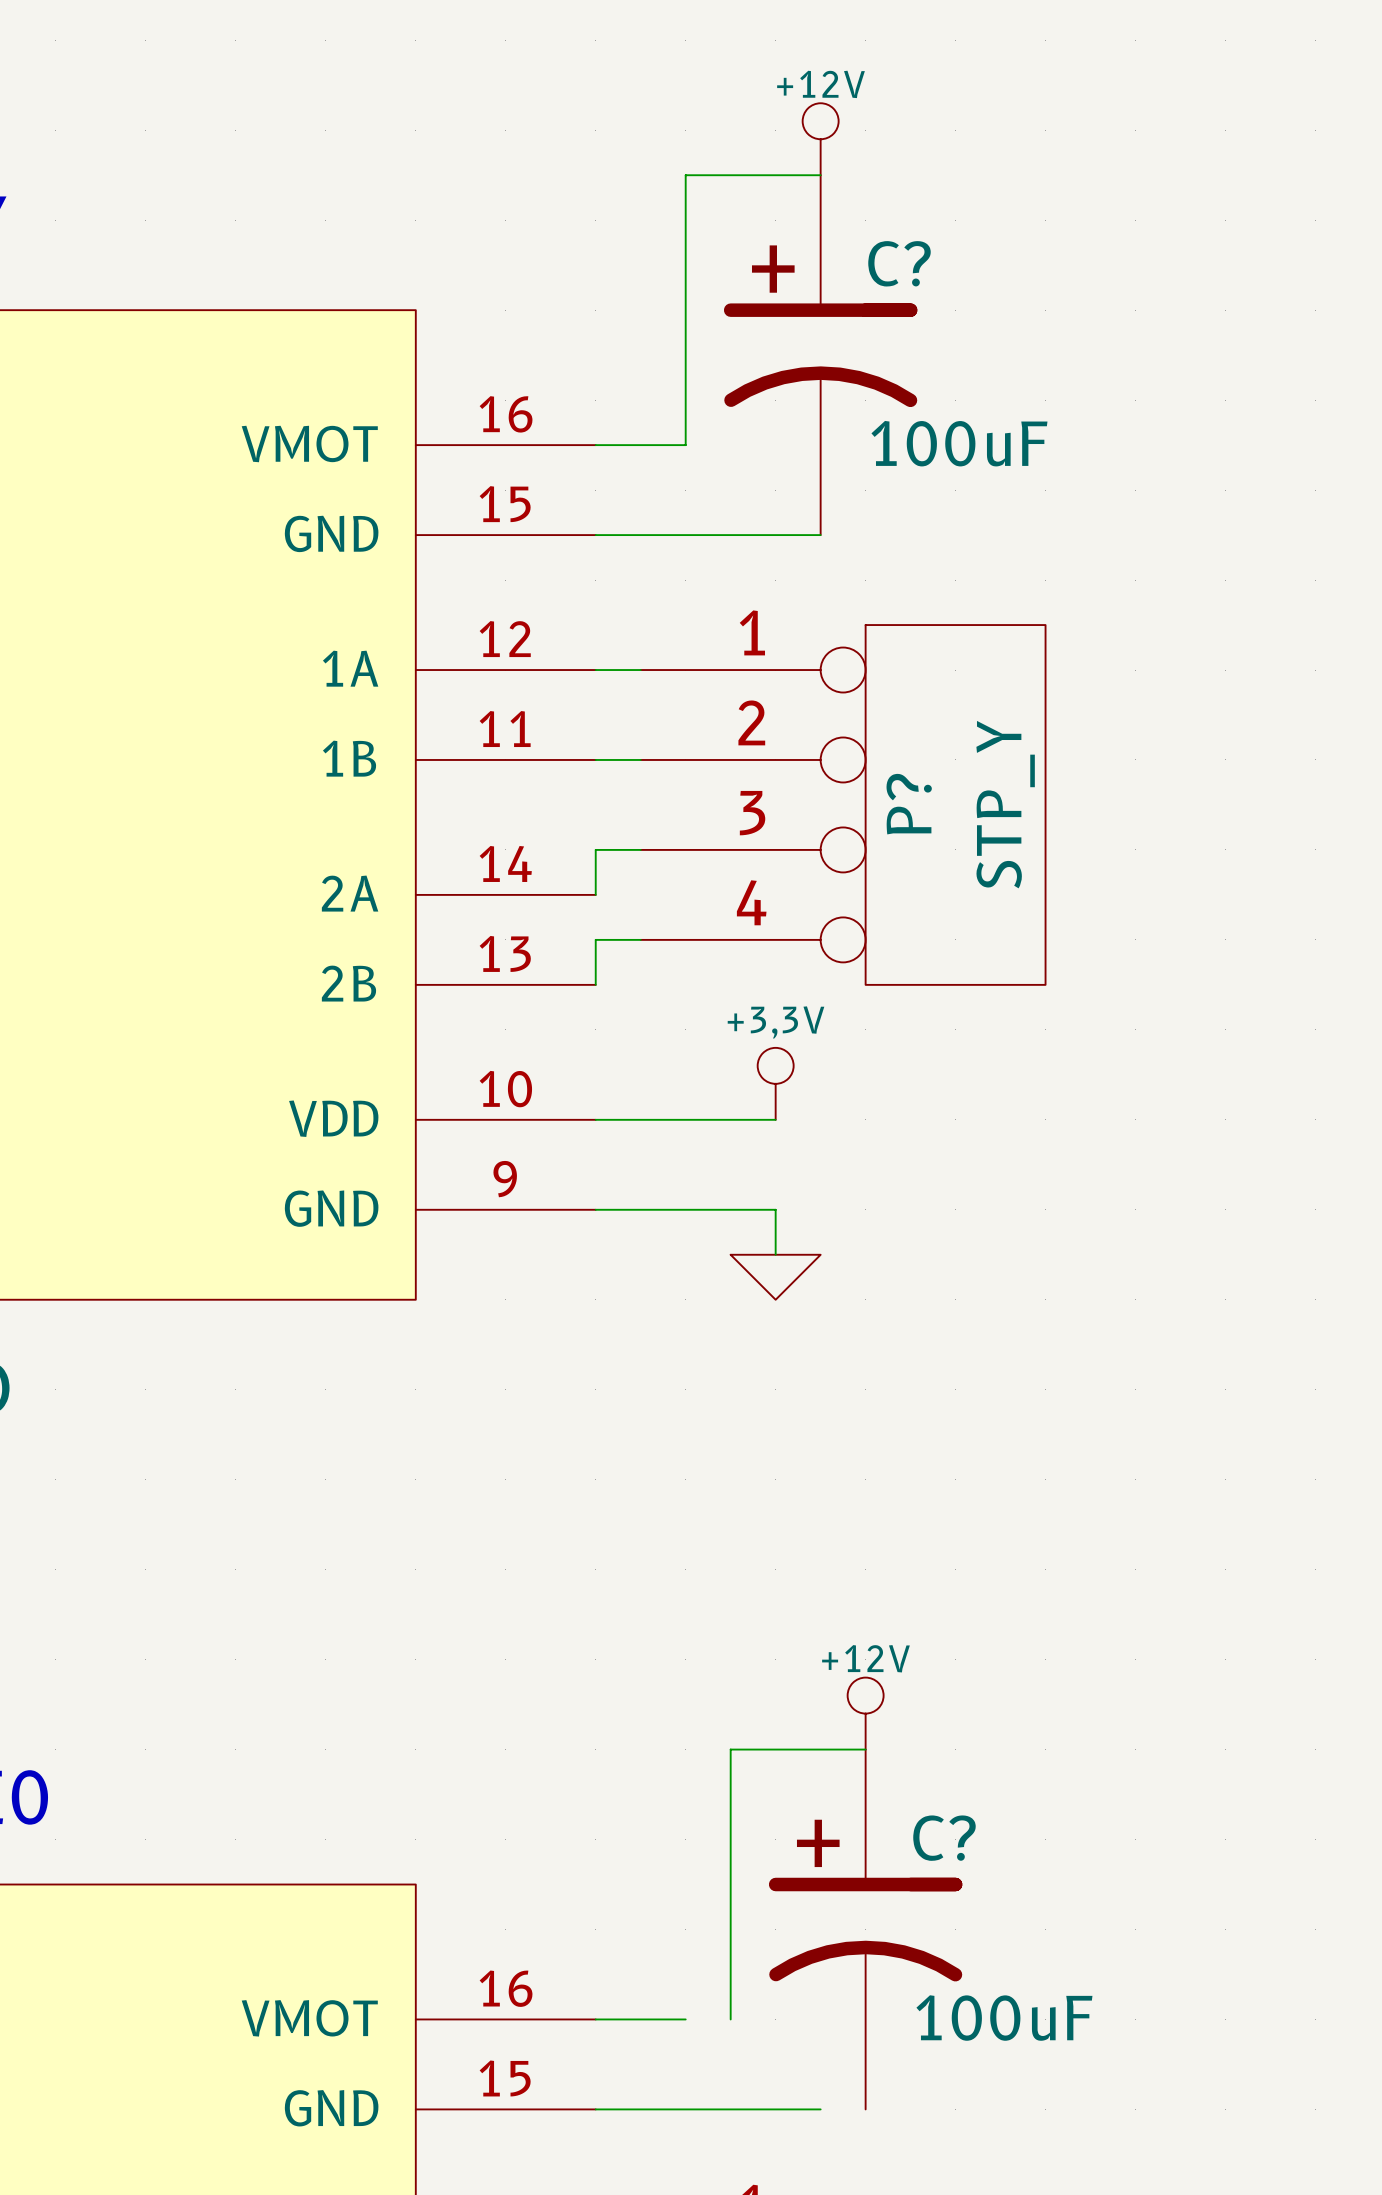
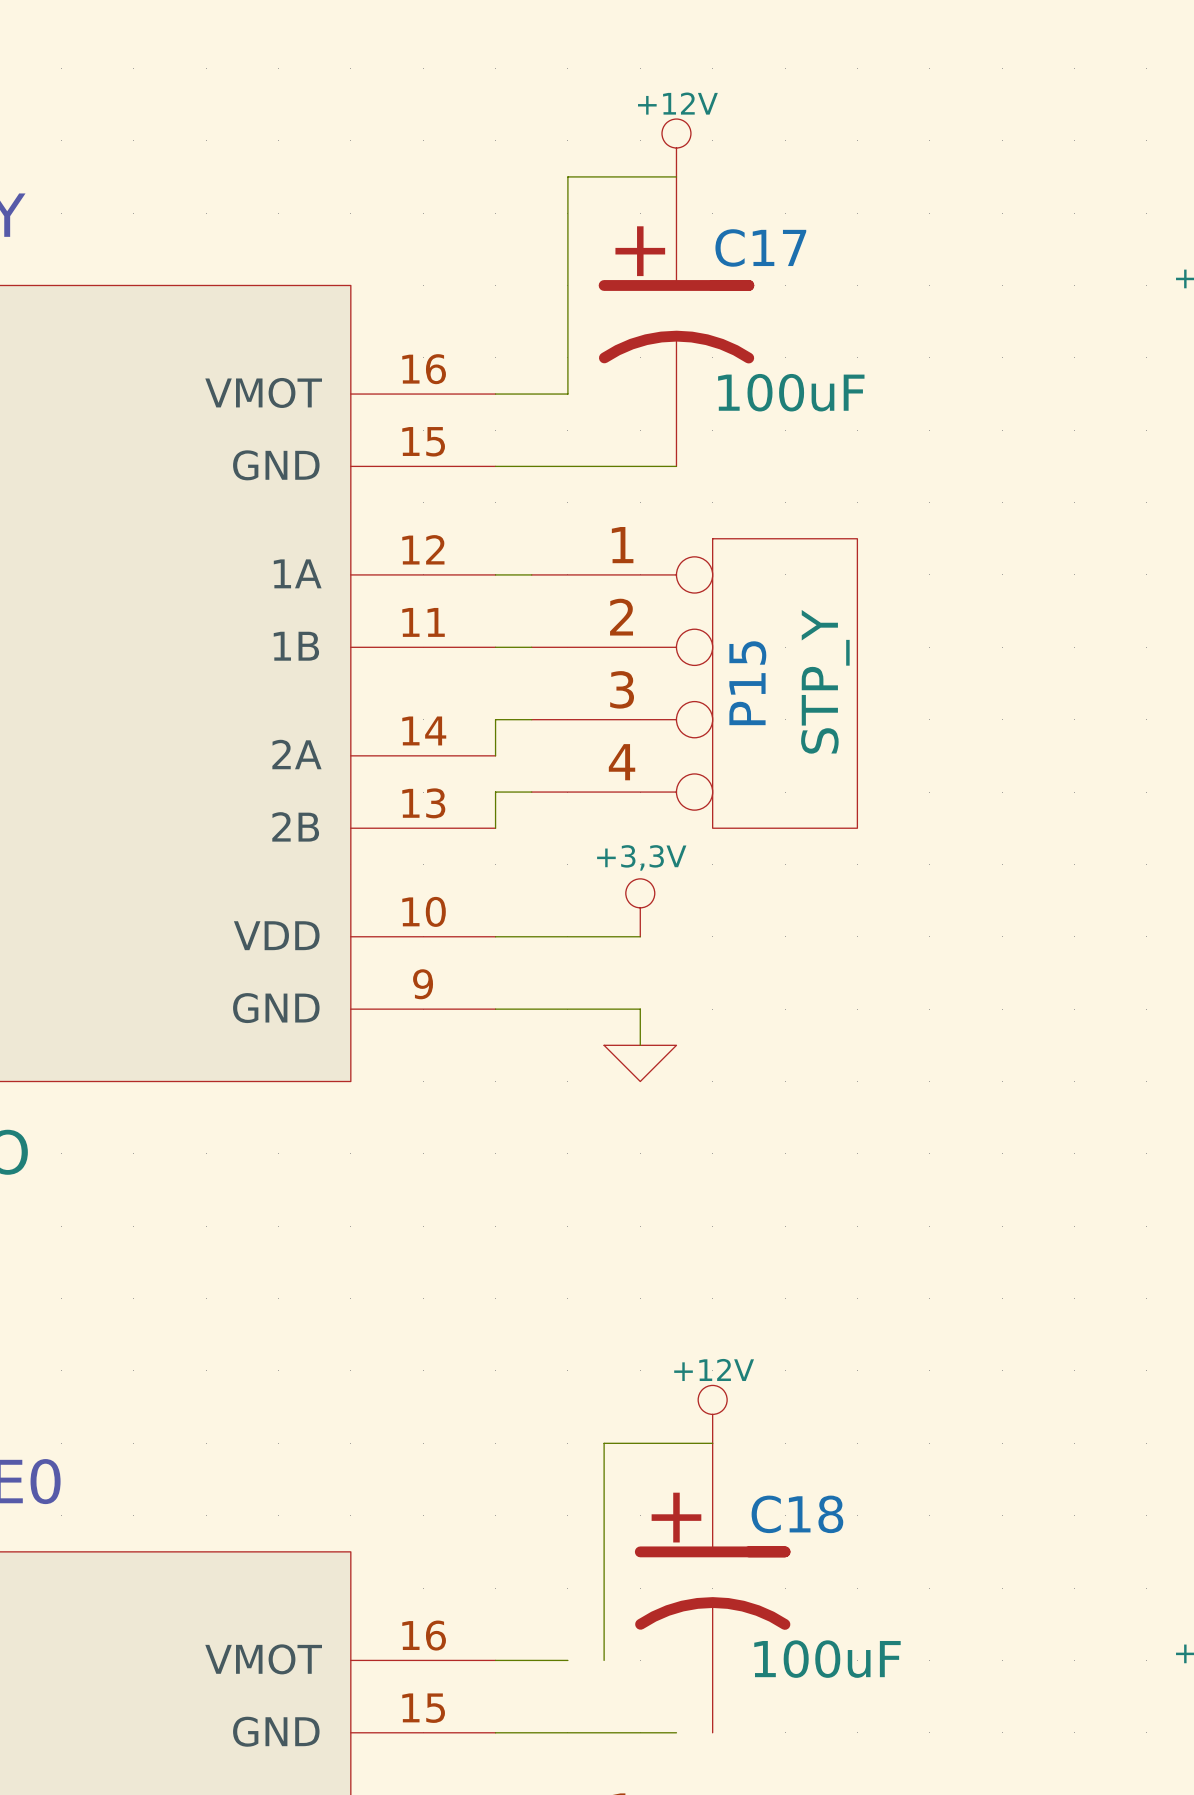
C? name: C? (899, 263) -> C17 (760, 247)
P? name: P? (909, 804) -> P15 (747, 683)
C? name: C? (944, 1838) -> C18 (797, 1514)

